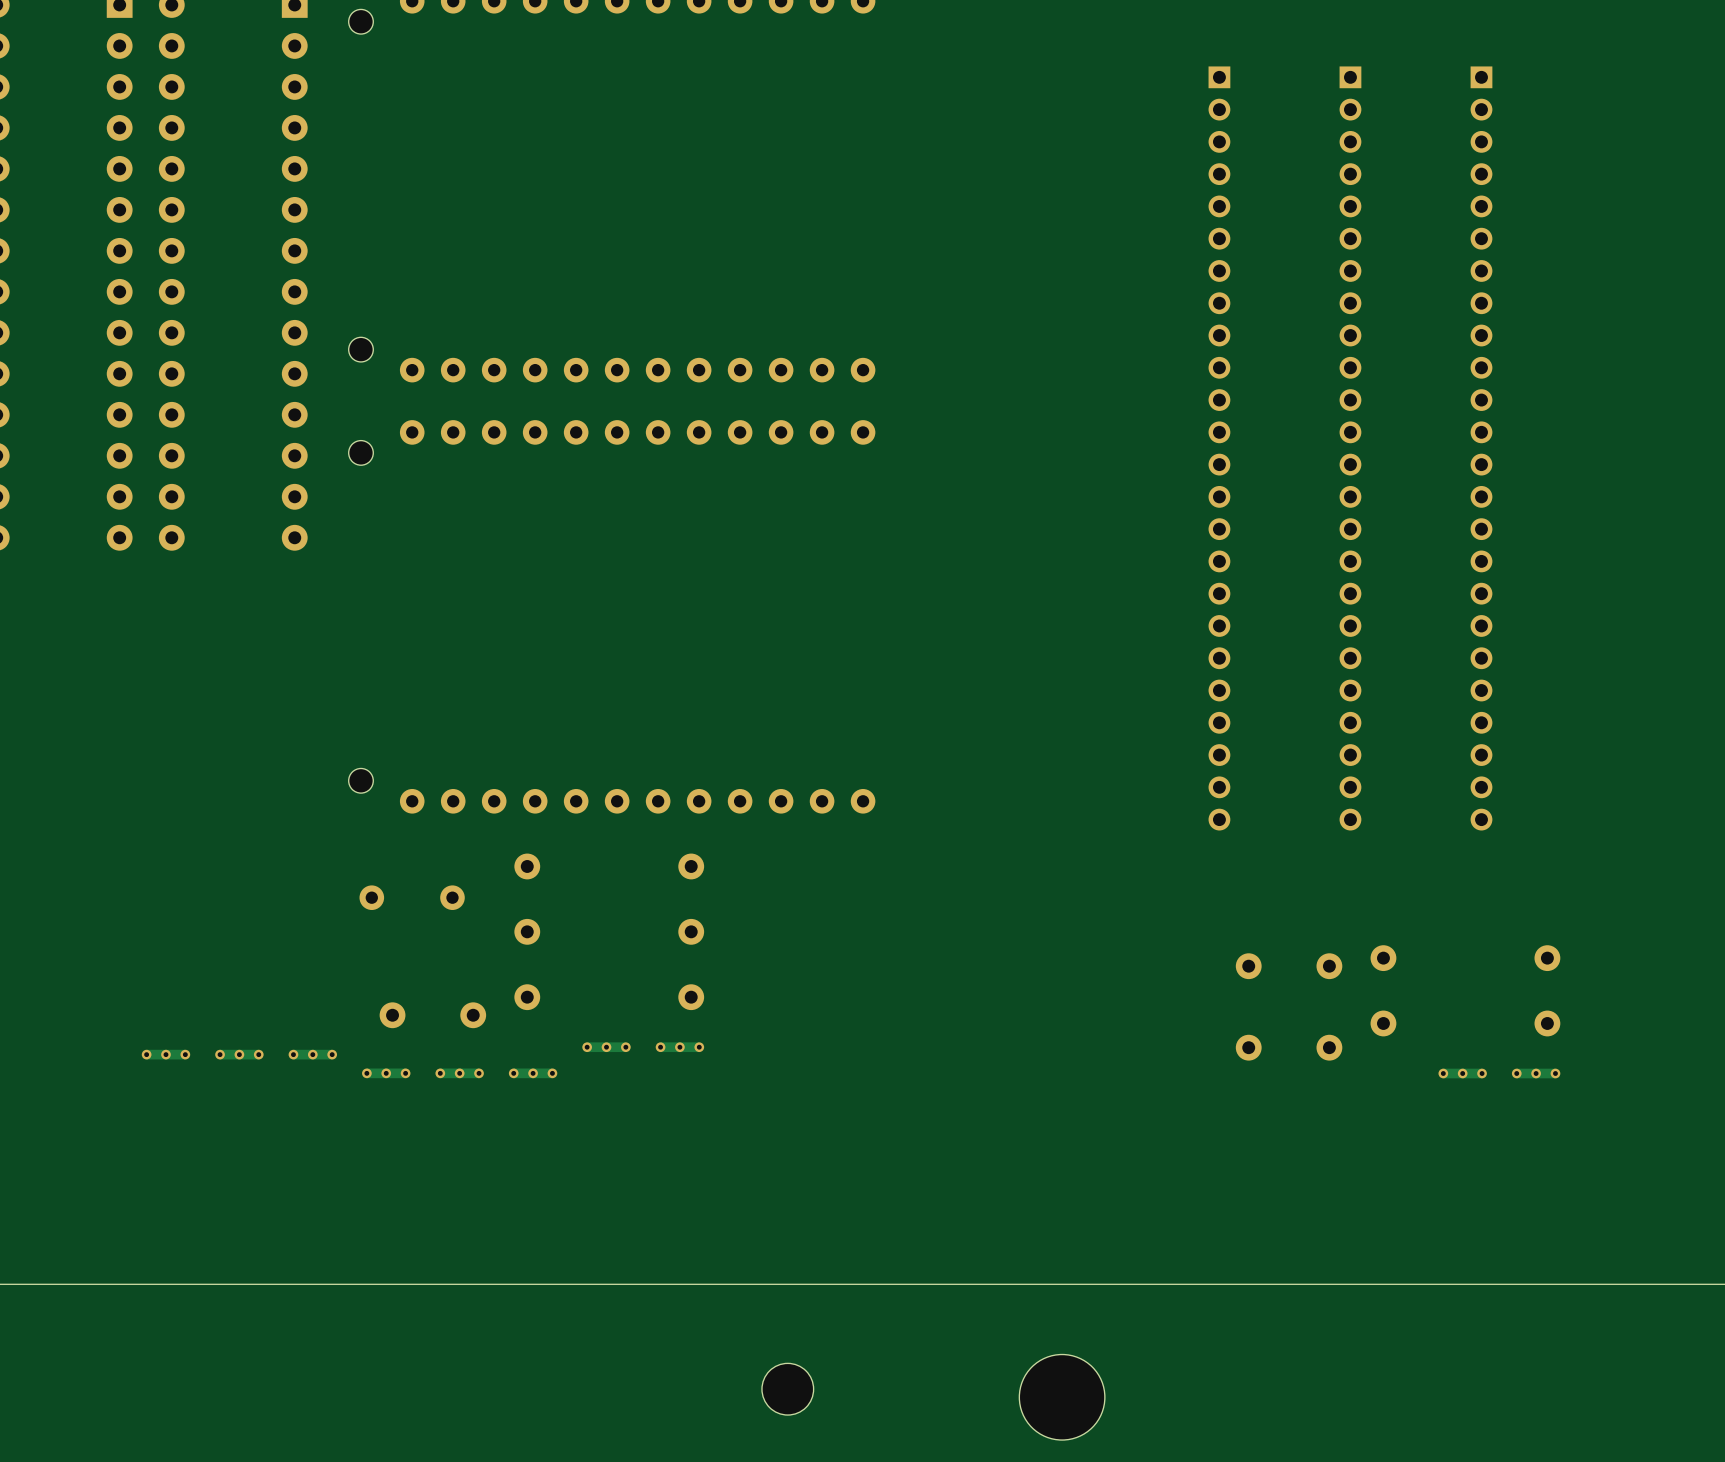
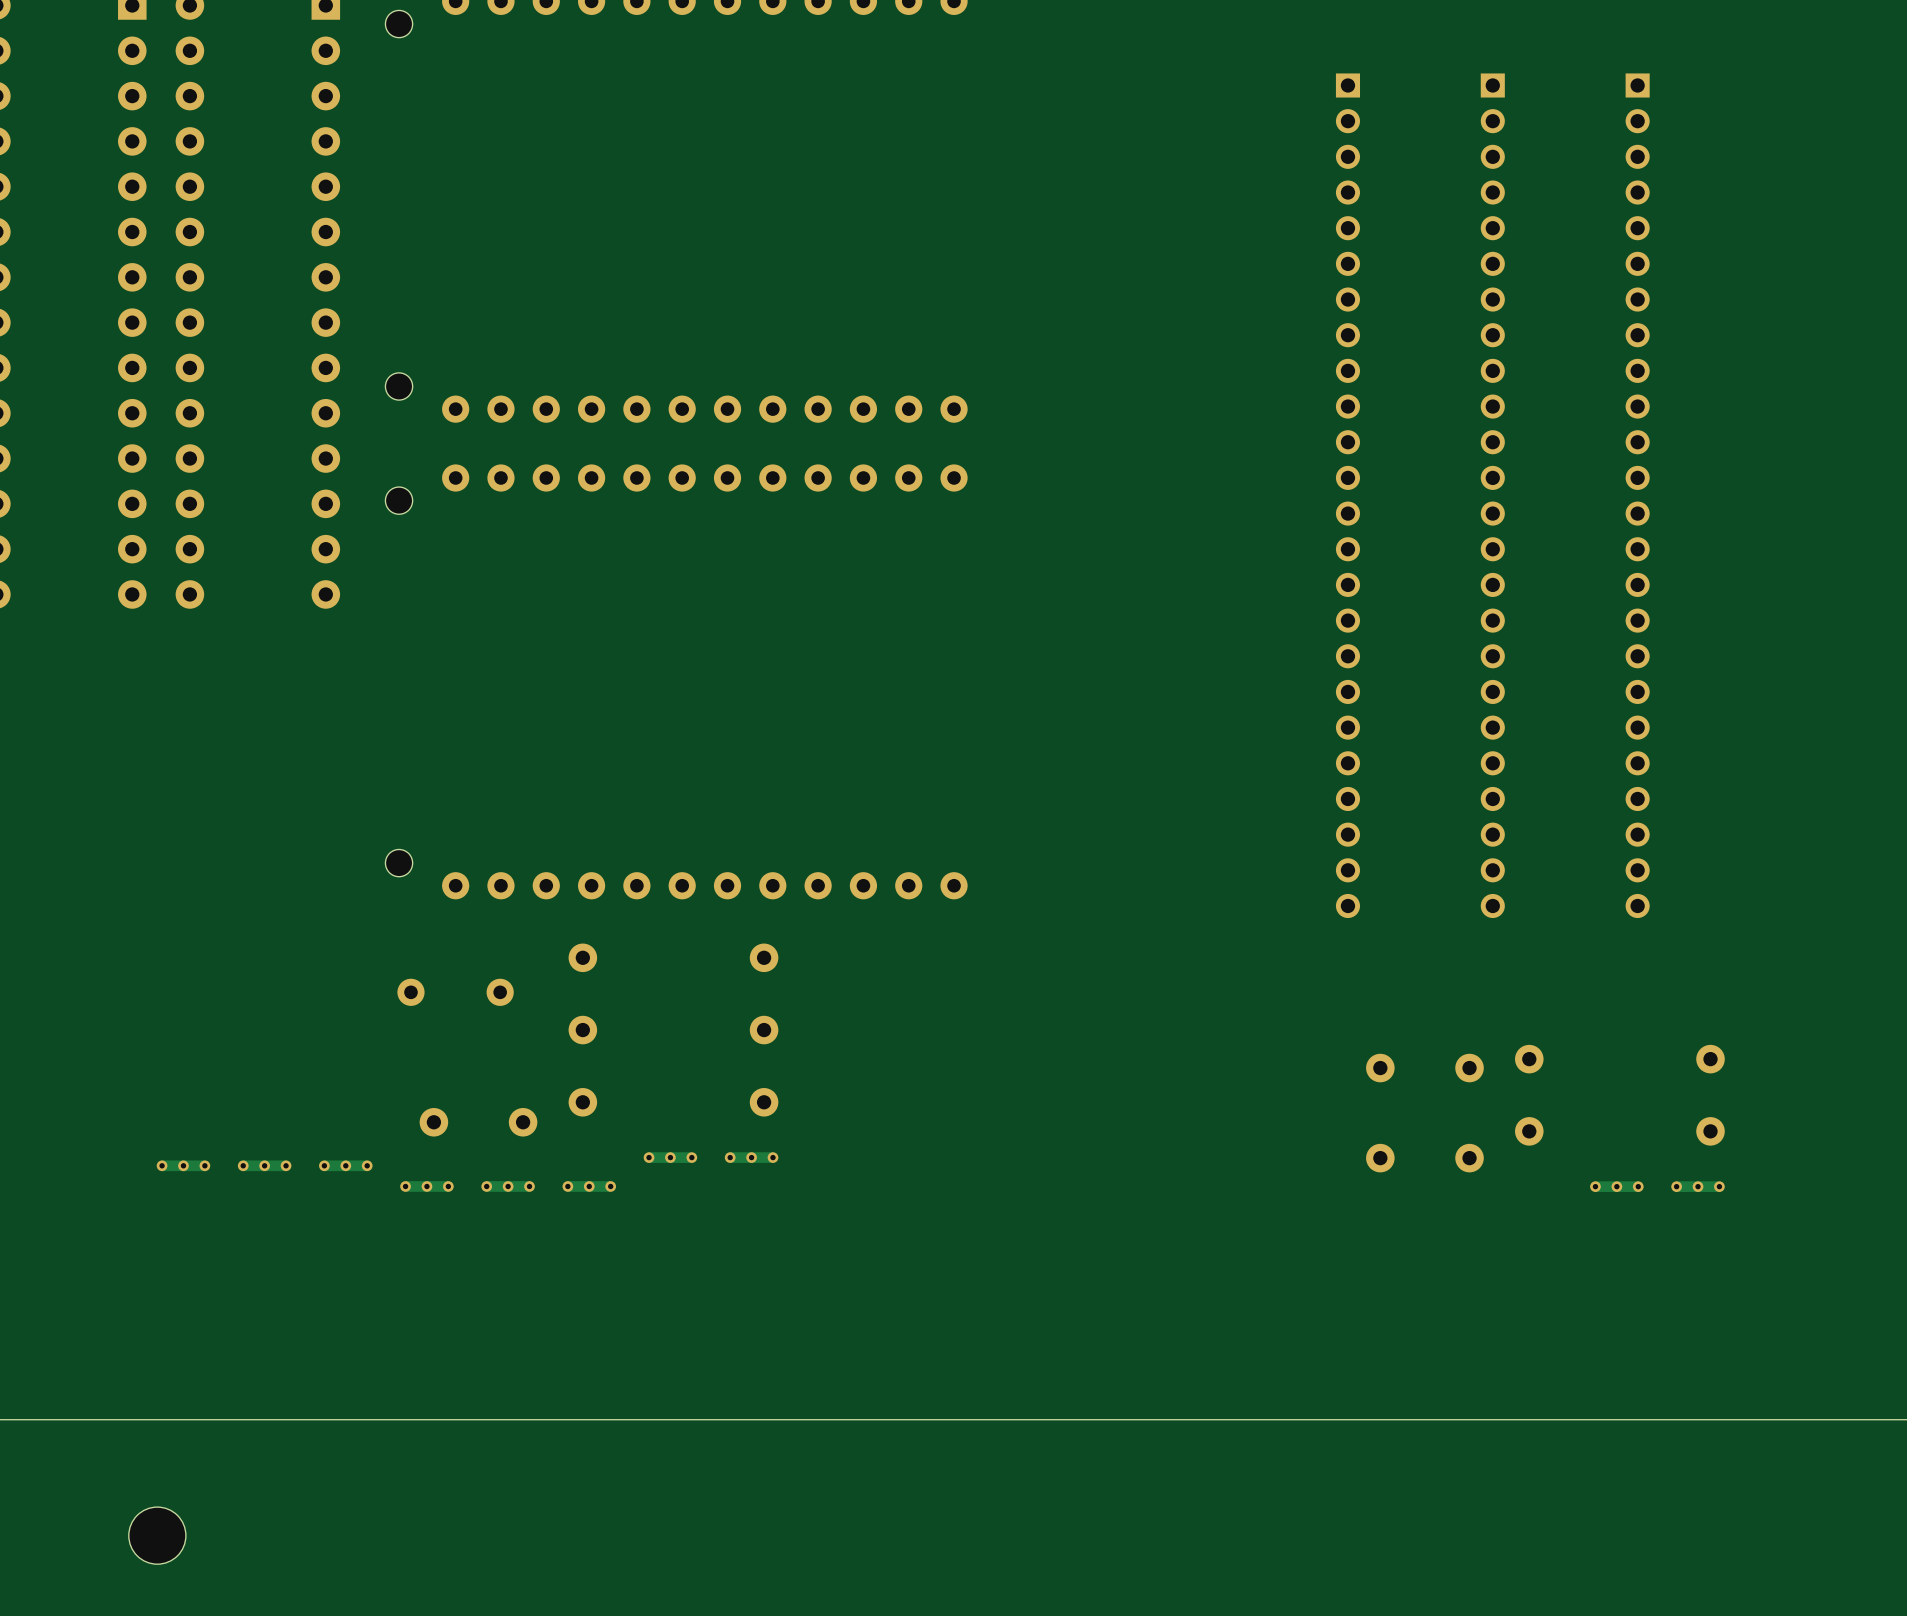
part: none -> (157, 1535)
part: (787, 1389) -> none
part: (1062, 1397) -> none

